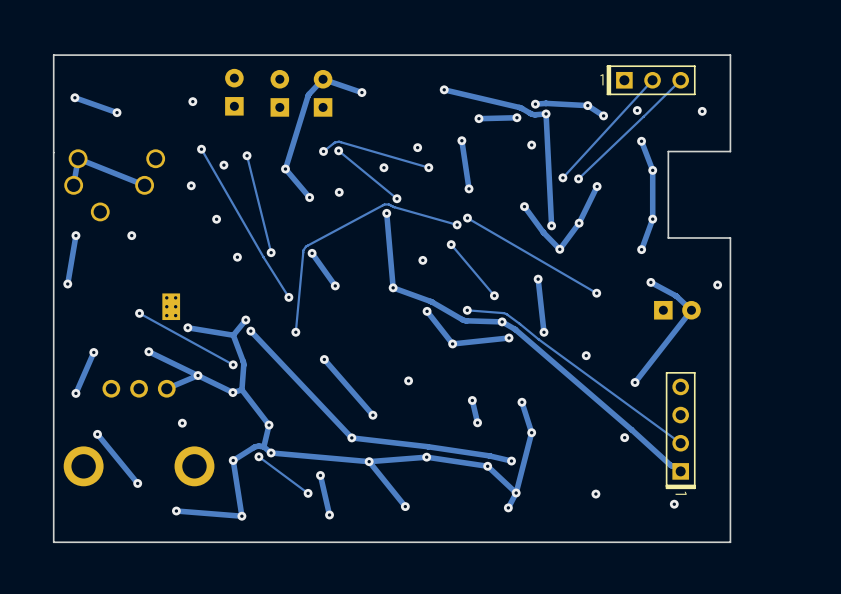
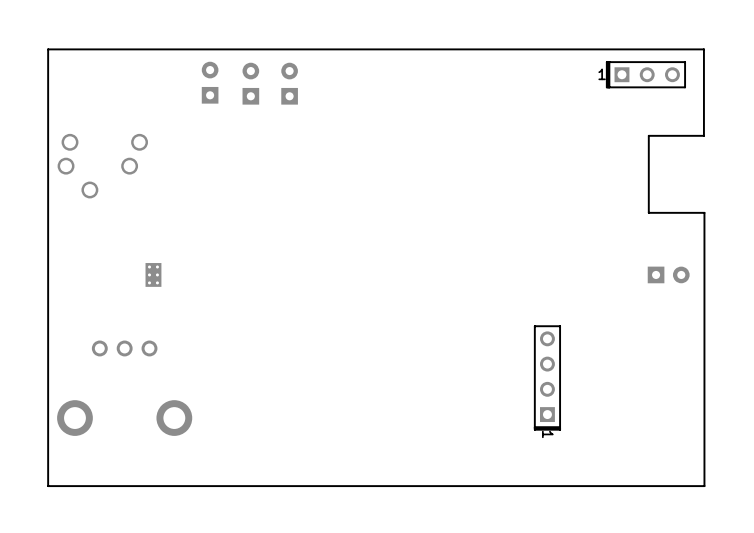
board edge: (730, 55) (730, 151) -> (654, 49) (703, 49) (703, 135) (654, 135)
part position: (651, 80) -> (645, 74)
track: (652, 80) (562, 177) -> none
track: (680, 80) (643, 116) -> none
track: (444, 89) (520, 107) (531, 114) (546, 113) (551, 225) -> none
via: (444, 89) -> none
track: (361, 92) (323, 79) (308, 95) (285, 169) (309, 197) -> none
via: (361, 92) -> none
track: (74, 97) (117, 112) -> none
via: (74, 97) -> none
via: (192, 101) -> none
track: (535, 104) (587, 105) (603, 115) -> none
via: (535, 104) -> none
via: (587, 105) -> none
via: (637, 110) -> none
via: (702, 111) -> none
via: (117, 112) -> none
via: (546, 113) -> none
via: (603, 115) -> none
track: (643, 116) (578, 178) -> none
track: (516, 117) (478, 118) -> none
via: (516, 117) -> none
via: (478, 118) -> none
track: (461, 140) (469, 188) -> none
via: (461, 140) -> none
track: (641, 141) (652, 170) (652, 219) (641, 249) -> none
via: (641, 141) -> none
via: (531, 145) -> none
via: (417, 147) -> none
track: (201, 149) (288, 297) -> none
via: (201, 149) -> none
track: (338, 150) (396, 198) -> none
via: (338, 150) -> none
track: (323, 151) (334, 142) (339, 141) (428, 167) -> none
via: (323, 151) -> none
board edge: (723, 151) (668, 151) (668, 237) (730, 237) (730, 542) -> (648, 135) (648, 212) (704, 212) (704, 486) (654, 486)
track: (247, 155) (271, 252) -> none
via: (247, 155) -> none
via: (223, 165) -> none
via: (383, 167) -> none
via: (428, 167) -> none
via: (285, 169) -> none
via: (652, 170) -> none
via: (562, 177) -> none
via: (578, 178) -> none
track: (144, 185) (78, 158) (73, 185) -> none
via: (191, 185) -> none
track: (597, 186) (579, 223) (559, 249) (543, 232) (524, 206) -> none
via: (597, 186) -> none
via: (469, 188) -> none
via: (339, 192) -> none
via: (309, 197) -> none
via: (396, 198) -> none
via: (524, 206) -> none
track: (386, 213) (393, 287) (431, 301) (463, 320) (502, 321) (514, 329) (670, 465) (675, 465) (680, 471) -> none
via: (386, 213) -> none
track: (467, 218) (596, 293) -> none
via: (467, 218) -> none
via: (216, 219) -> none
via: (652, 219) -> none
via: (579, 223) -> none
track: (457, 224) (384, 204) (305, 246) (303, 250) (295, 332) -> none
via: (457, 224) -> none
via: (551, 225) -> none
track: (75, 235) (67, 284) -> none
via: (75, 235) -> none
via: (131, 235) -> none
track: (451, 244) (494, 295) -> none
via: (451, 244) -> none
via: (559, 249) -> none
via: (641, 249) -> none
via: (271, 252) -> none
track: (312, 253) (335, 285) -> none
via: (312, 253) -> none
via: (237, 257) -> none
via: (422, 260) -> none
track: (538, 279) (543, 332) -> none
via: (538, 279) -> none
track: (650, 282) (675, 295) (691, 310) (635, 382) -> none
via: (650, 282) -> none
via: (67, 284) -> none
via: (717, 284) -> none
via: (335, 285) -> none
via: (393, 287) -> none
via: (596, 293) -> none
via: (494, 295) -> none
via: (288, 297) -> none
track: (467, 310) (506, 314) (680, 443) -> none
via: (467, 310) -> none
part position: (677, 310) -> (668, 274)
track: (427, 311) (452, 343) (509, 337) -> none
via: (427, 311) -> none
track: (139, 313) (233, 364) -> none
via: (139, 313) -> none
track: (245, 320) (233, 335) -> none
via: (245, 320) -> none
via: (502, 321) -> none
track: (187, 327) (233, 335) -> none
via: (187, 327) -> none
track: (250, 331) (351, 437) (489, 455) -> none
via: (250, 331) -> none
via: (295, 332) -> none
via: (543, 332) -> none
track: (233, 335) (243, 362) (241, 389) -> none
via: (509, 337) -> none
via: (452, 343) -> none
track: (148, 351) (197, 375) -> none
via: (148, 351) -> none
track: (93, 352) (75, 393) -> none
via: (93, 352) -> none
via: (586, 355) -> none
track: (324, 359) (372, 415) -> none
via: (324, 359) -> none
via: (233, 364) -> none
track: (197, 375) (166, 388) -> none
track: (197, 375) (232, 392) (241, 389) -> none
via: (197, 375) -> none
via: (408, 380) -> none
via: (635, 382) -> none
track: (241, 389) (269, 425) (263, 446) -> none
via: (232, 392) -> none
via: (75, 393) -> none
track: (472, 400) (477, 422) -> none
via: (472, 400) -> none
track: (521, 402) (531, 432) (516, 492) -> none
via: (521, 402) -> none
via: (372, 415) -> none
via: (477, 422) -> none
via: (182, 423) -> none
via: (269, 425) -> none
part position: (680, 430) -> (547, 377)
via: (531, 432) -> none
track: (97, 434) (137, 483) -> none
via: (97, 434) -> none
via: (351, 437) -> none
via: (624, 437) -> none
track: (263, 446) (254, 446) (233, 460) (241, 516) (176, 511) -> none
track: (263, 446) (271, 452) (369, 461) -> none
via: (271, 452) -> none
track: (258, 456) (308, 493) -> none
via: (258, 456) -> none
track: (490, 456) (511, 461) -> none
via: (426, 457) -> none
via: (233, 460) -> none
track: (369, 461) (405, 506) -> none
track: (369, 461) (426, 457) (487, 466) (516, 492) -> none
via: (369, 461) -> none
via: (511, 461) -> none
via: (487, 466) -> none
track: (320, 475) (329, 515) -> none
via: (320, 475) -> none
via: (137, 483) -> none
track: (516, 492) (508, 507) -> none
via: (516, 492) -> none
via: (308, 493) -> none
via: (595, 494) -> none
via: (674, 504) -> none
via: (405, 506) -> none
via: (508, 507) -> none
via: (176, 511) -> none
via: (329, 515) -> none
via: (241, 516) -> none

